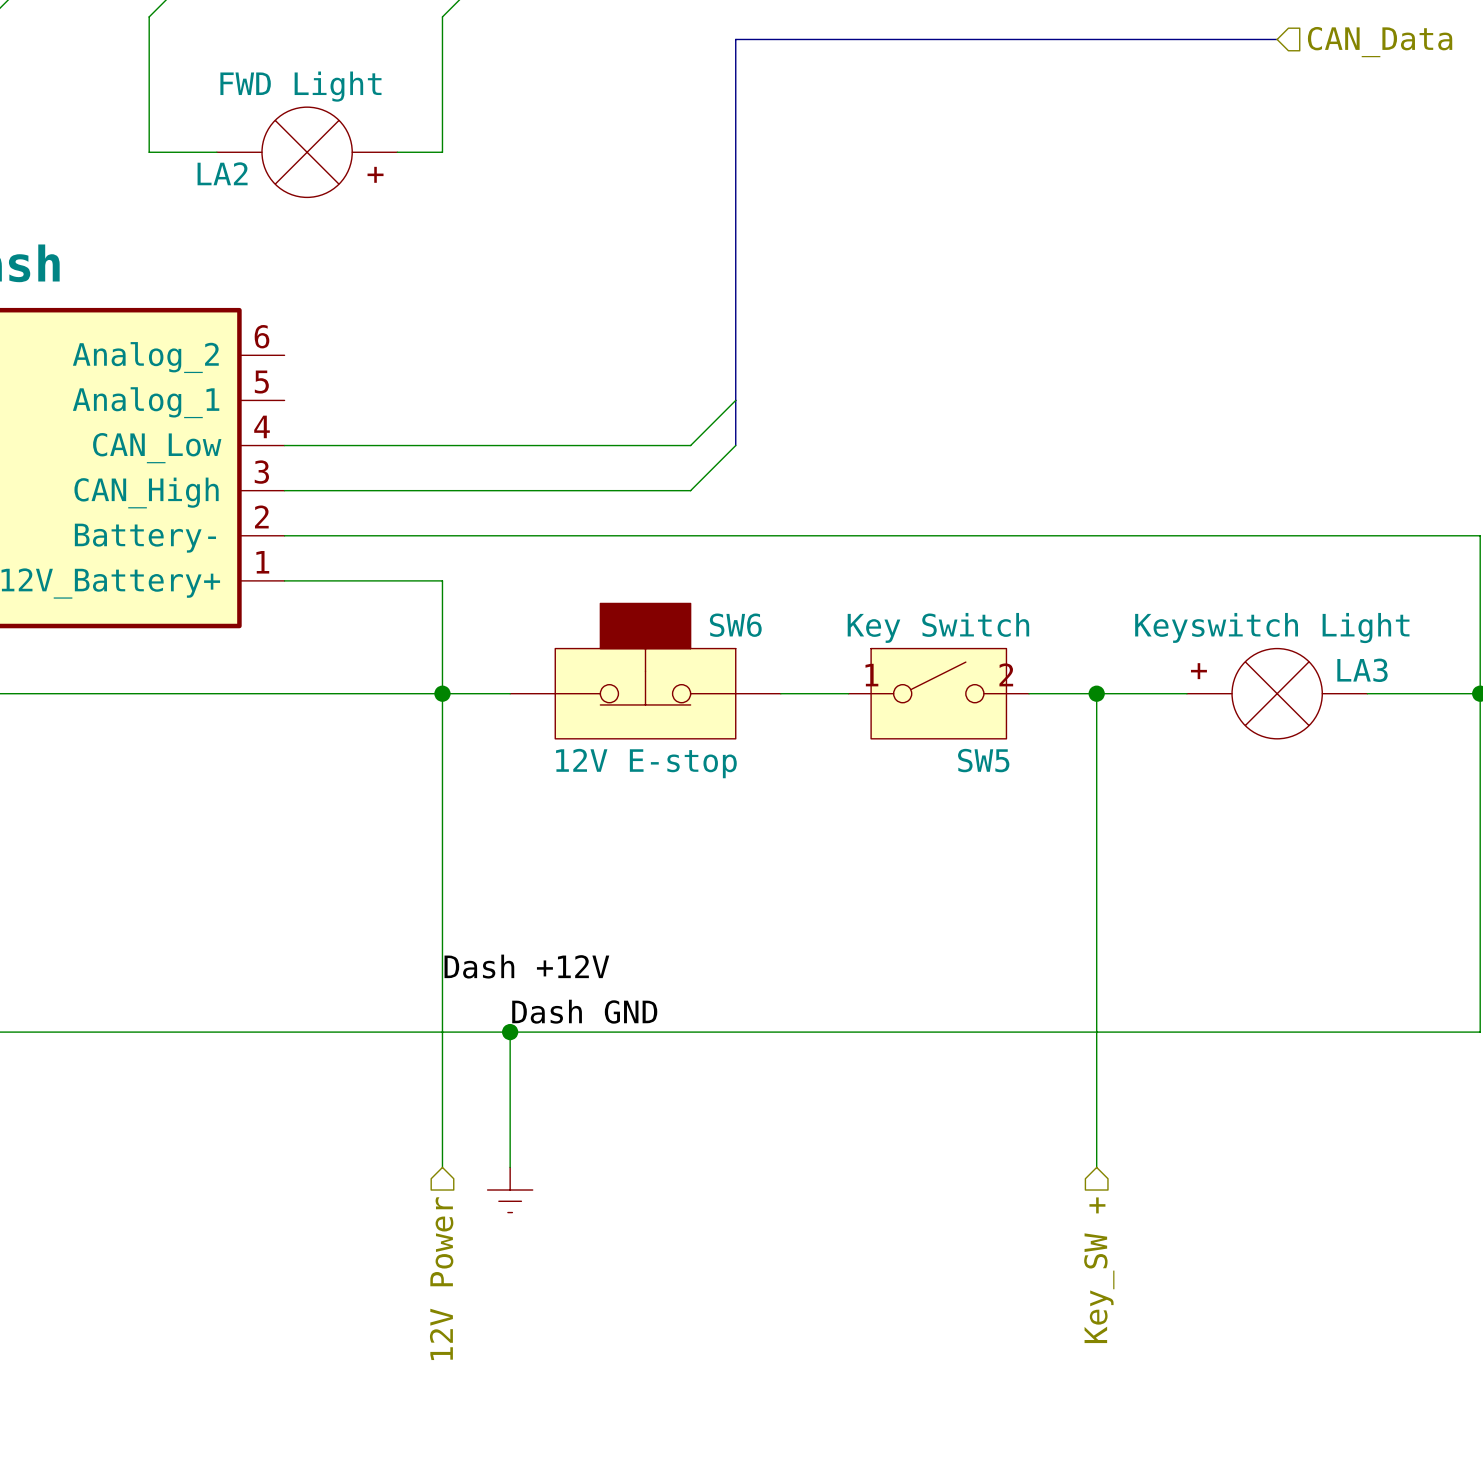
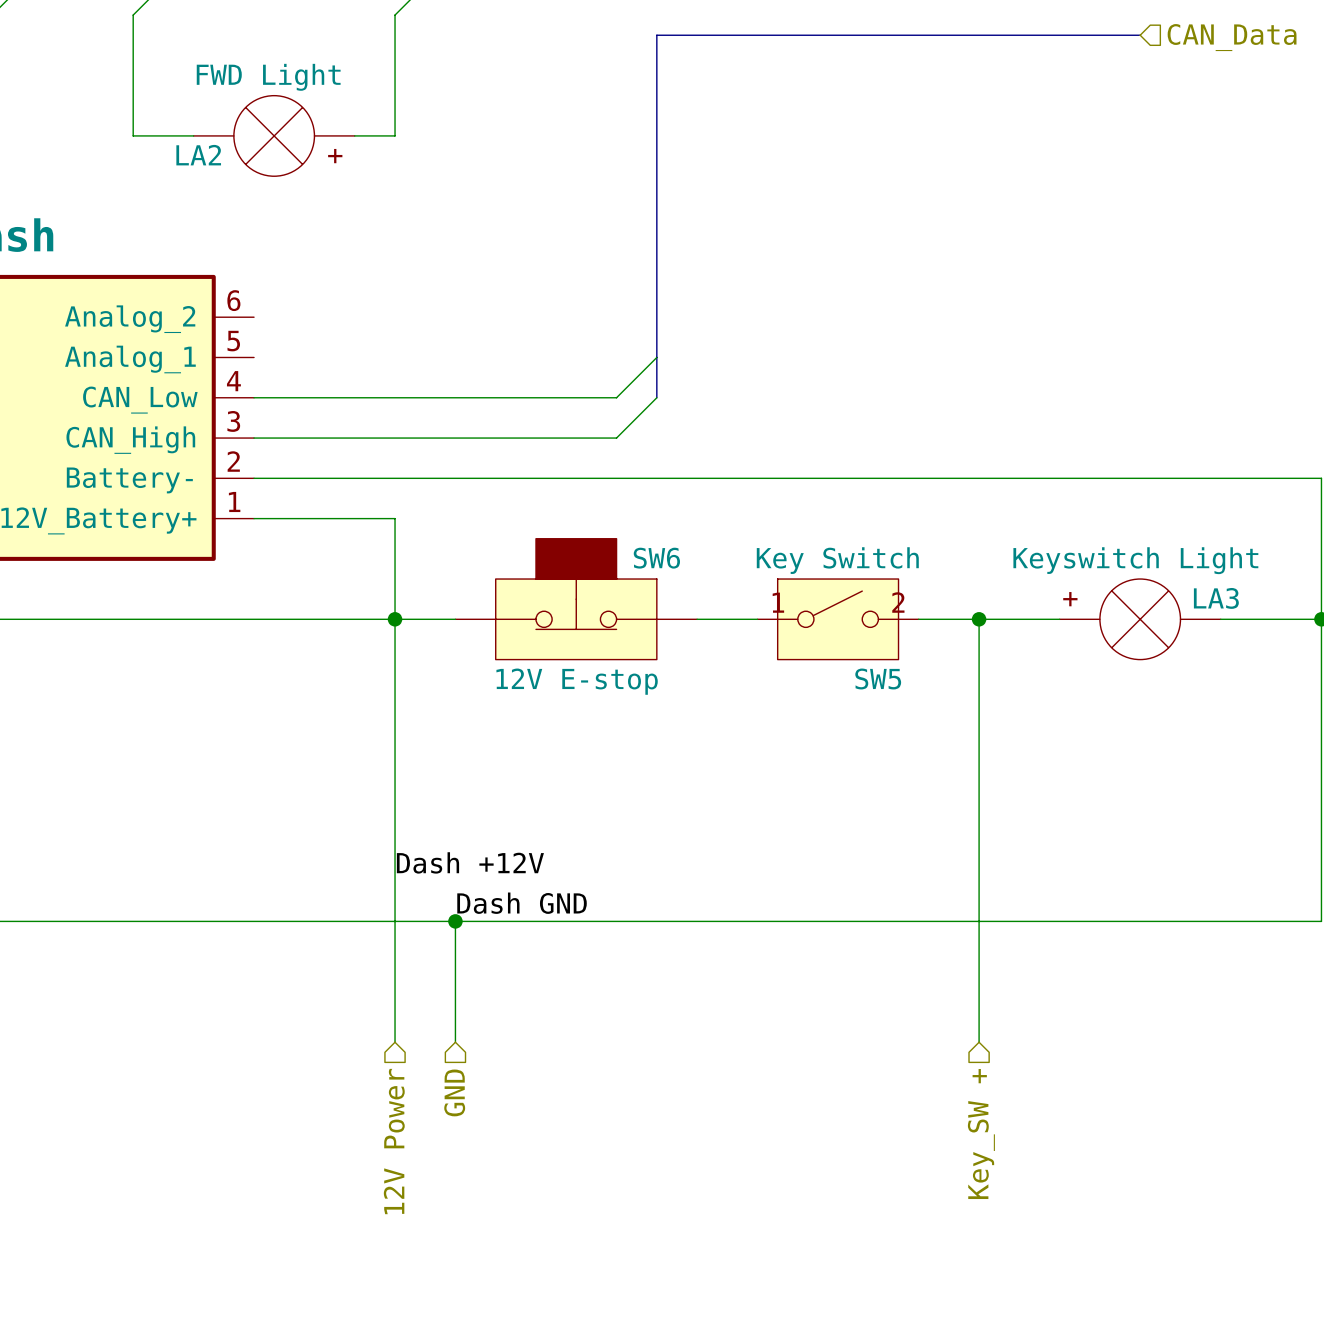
power symbol: (510, 1190) -> none
hierarchical label: none -> GND (454, 1092)

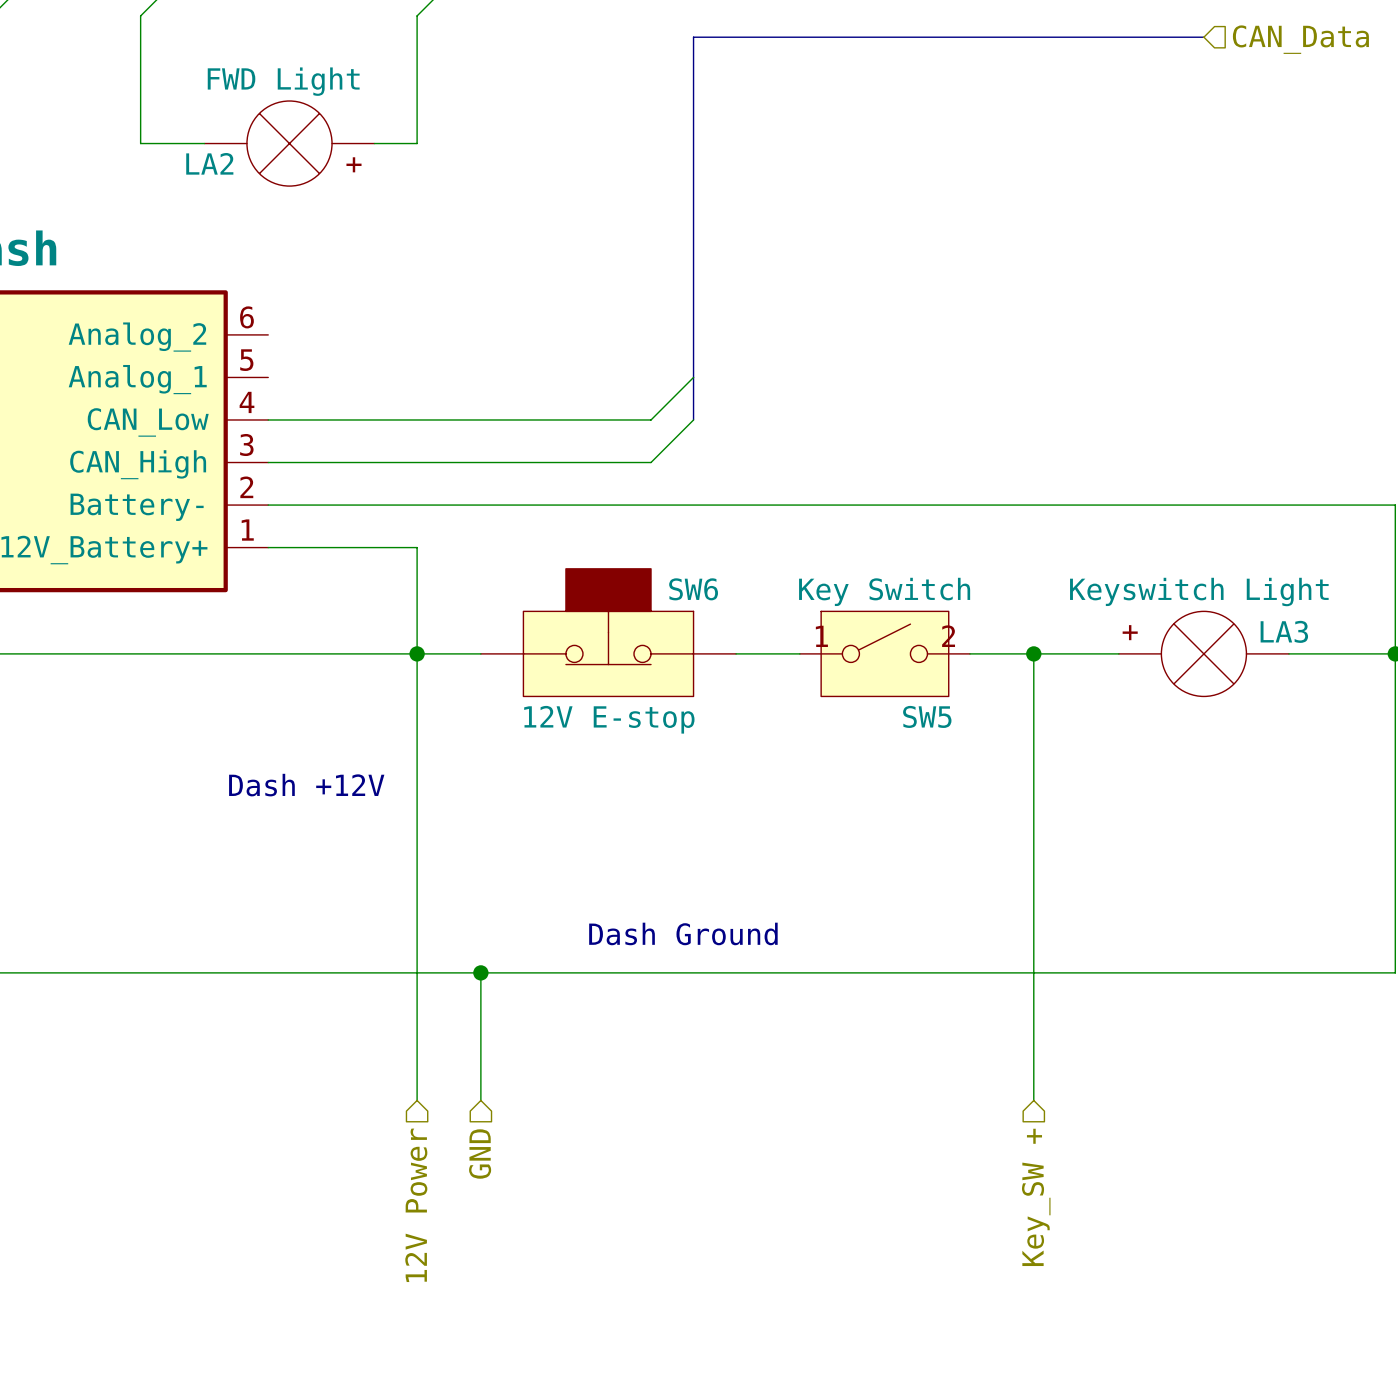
text: none -> Dash +12V (306, 785)
label: Dash +12V (470, 862) -> none
text: none -> Dash Ground (683, 933)
label: Dash GND (522, 903) -> none

